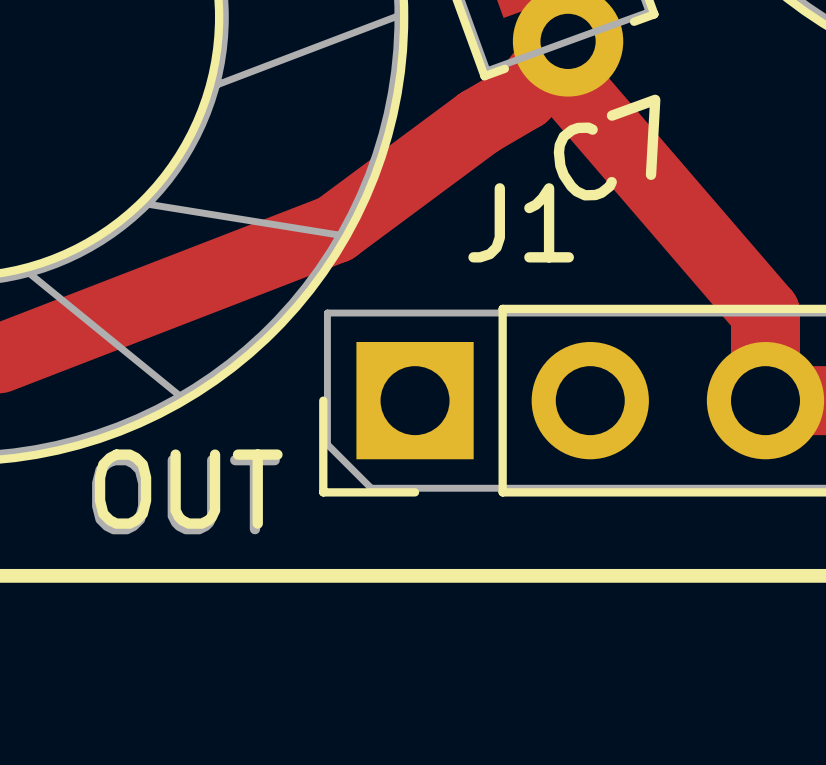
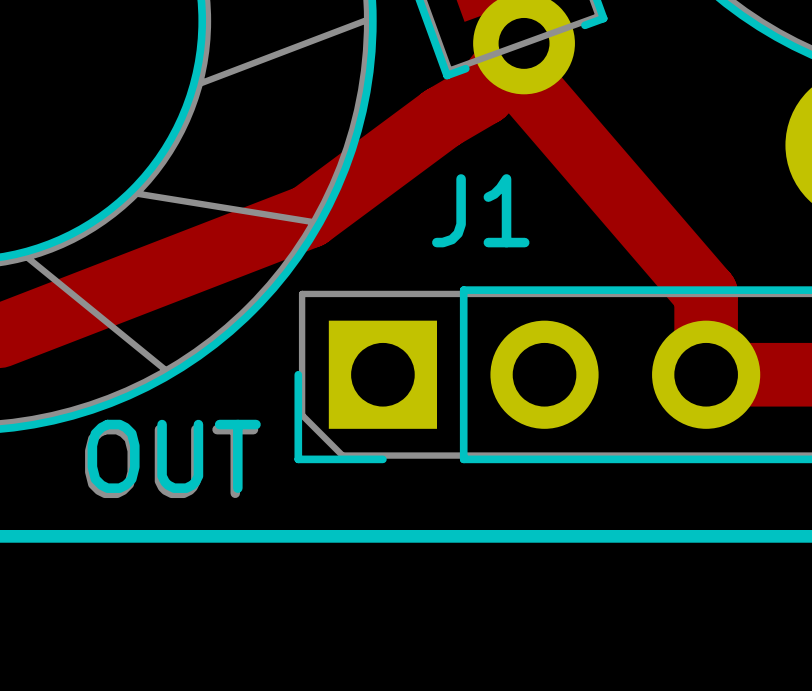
text: C7 (607, 147) -> none

